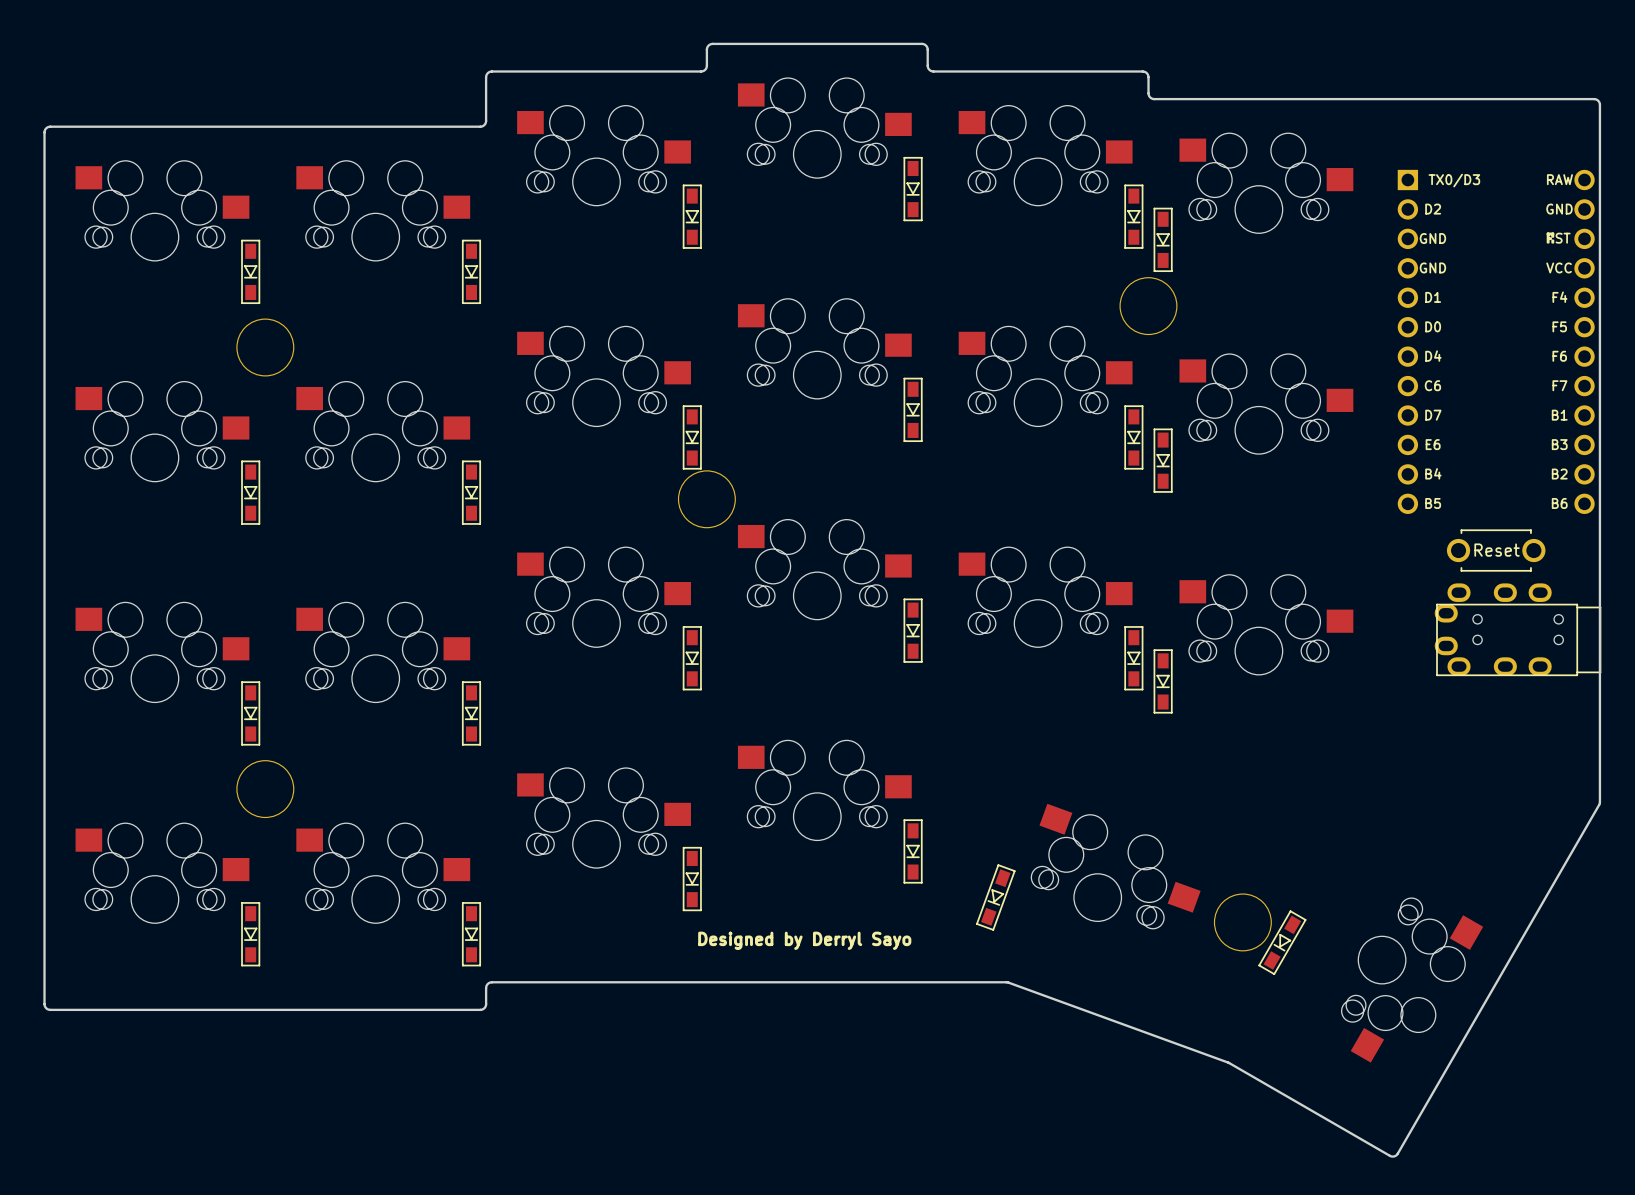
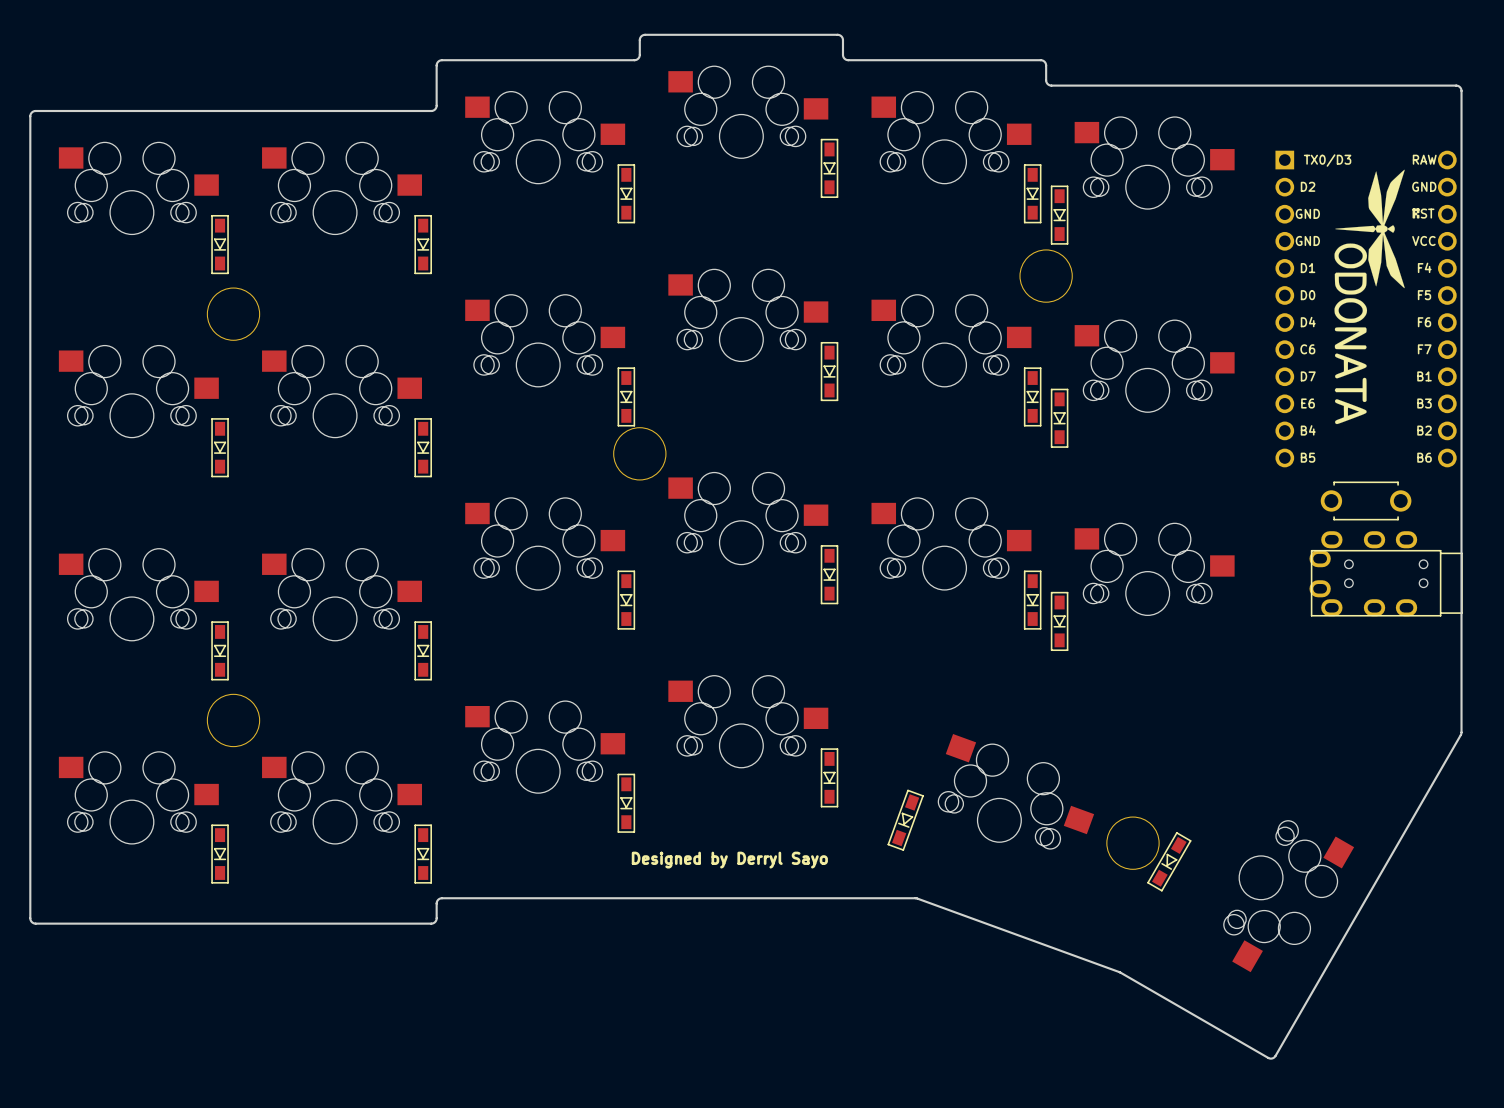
drawing: none -> [1334, 169, 1405, 425]
part value: Reset (1497, 550) -> none

